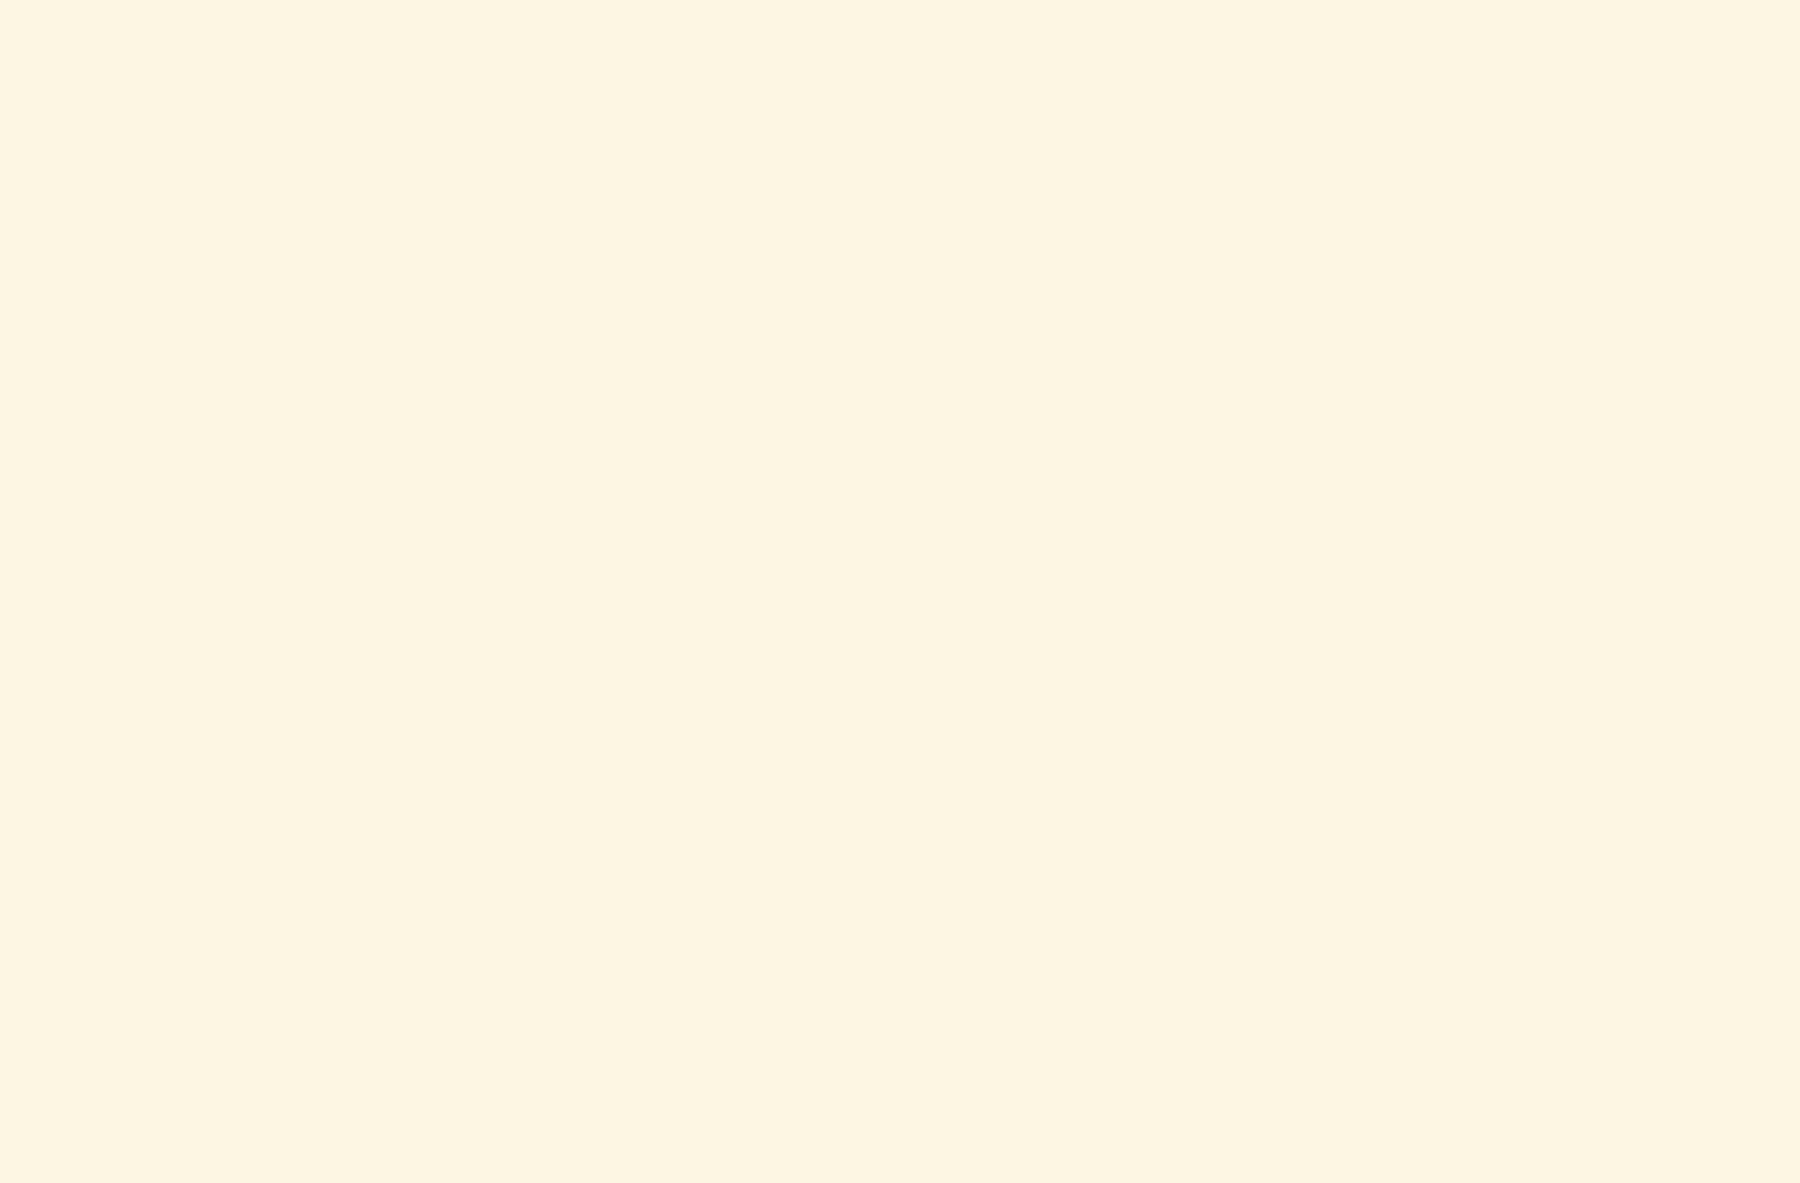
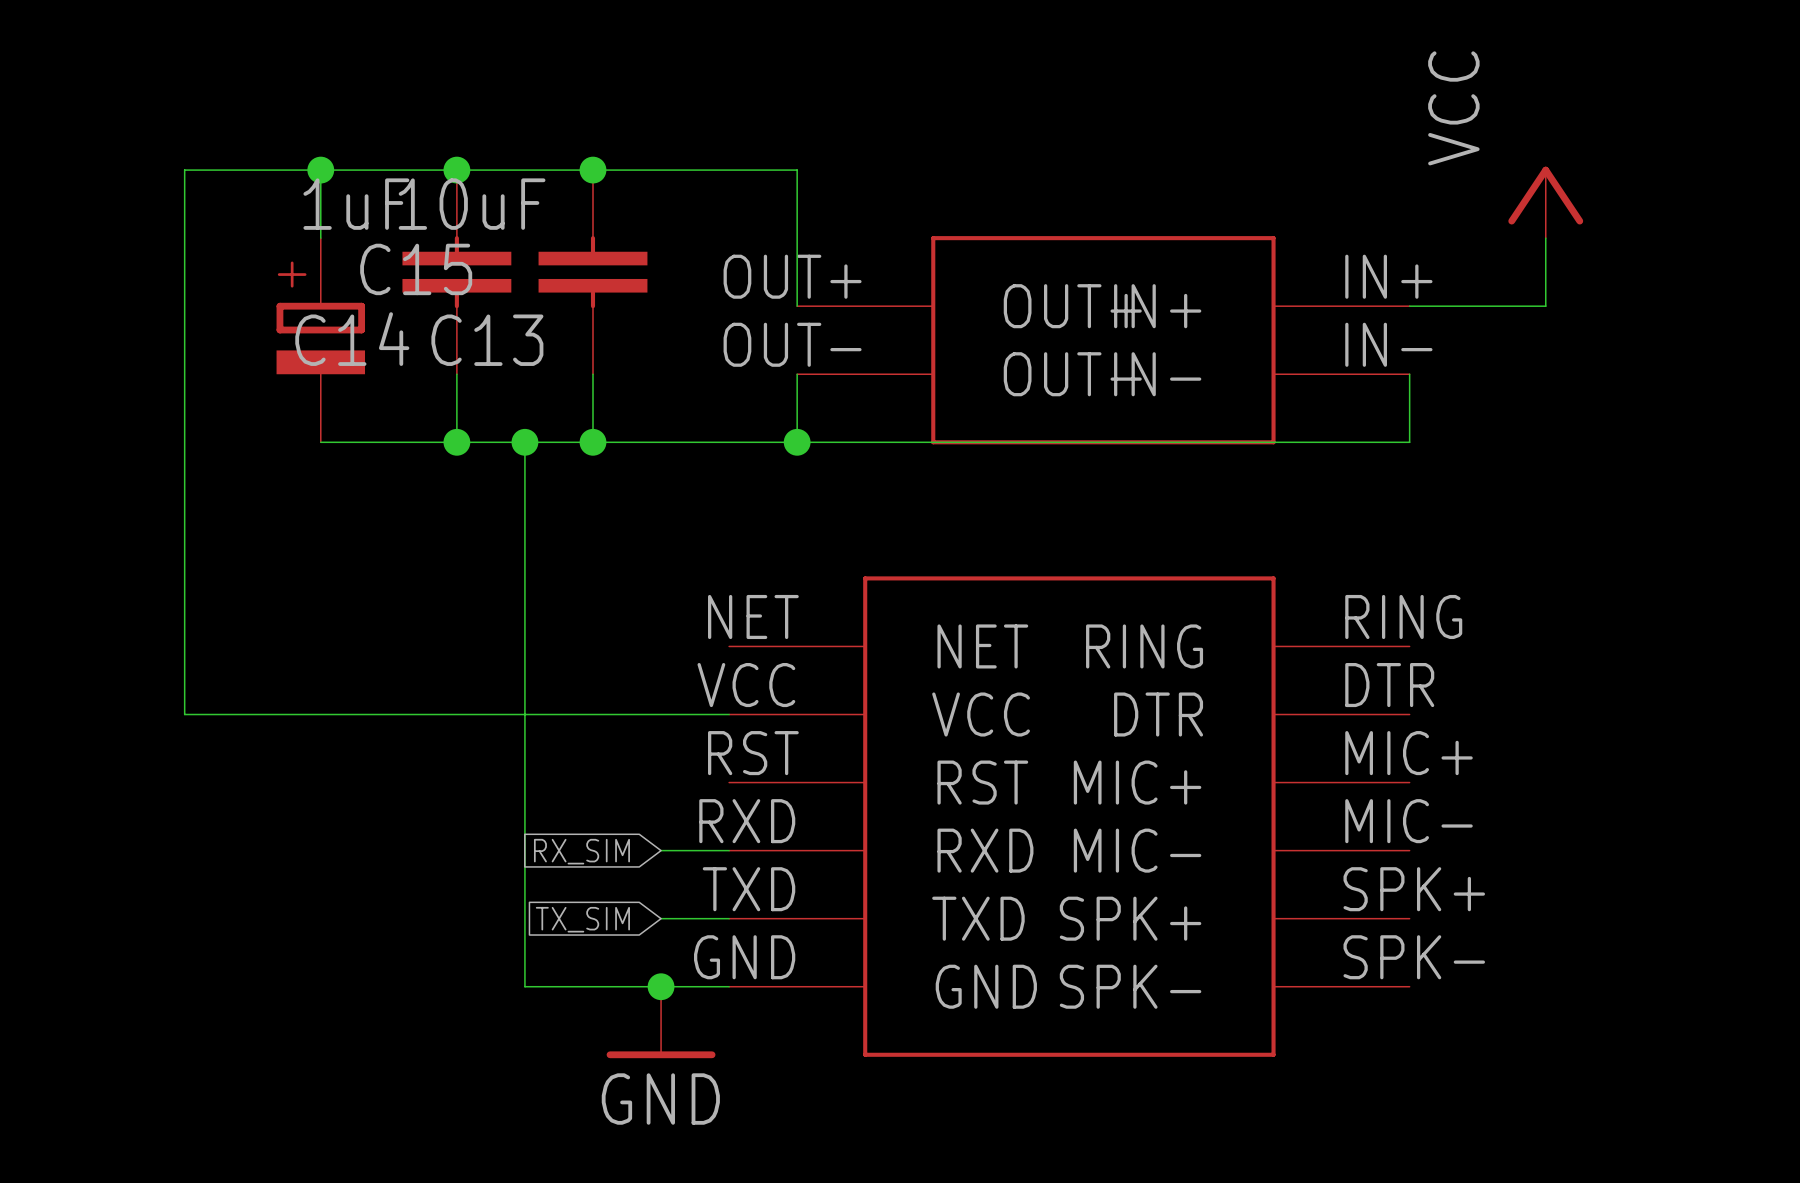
wire: none -> (320, 170) (320, 238)
junction: none -> (320, 170)
junction: none -> (456, 170)
junction: none -> (592, 170)
power symbol: none -> VCC (1545, 202)
wire: none -> (1545, 238) (1545, 306) (1409, 306)
C14: none -> 1uF (456, 272)
C13: none -> 10uF (592, 272)
wire: none -> (797, 306) (797, 170) (184, 170) (184, 714) (729, 714)
C15: none -> (320, 340)
part: none -> (1103, 340)
wire: none -> (456, 374) (456, 442)
wire: none -> (592, 374) (592, 442)
wire: none -> (797, 374) (797, 442)
wire: none -> (1409, 374) (1409, 442) (320, 442)
junction: none -> (456, 442)
wire: none -> (524, 442) (524, 986) (729, 986)
junction: none -> (524, 442)
junction: none -> (592, 442)
junction: none -> (797, 442)
part: none -> (1069, 816)
wire: none -> (661, 850) (729, 850)
global label: none -> RX_SIM (581, 851)
wire: none -> (661, 918) (729, 918)
global label: none -> TX_SIM (582, 919)
junction: none -> (661, 986)
power symbol: none -> GND (661, 1022)

